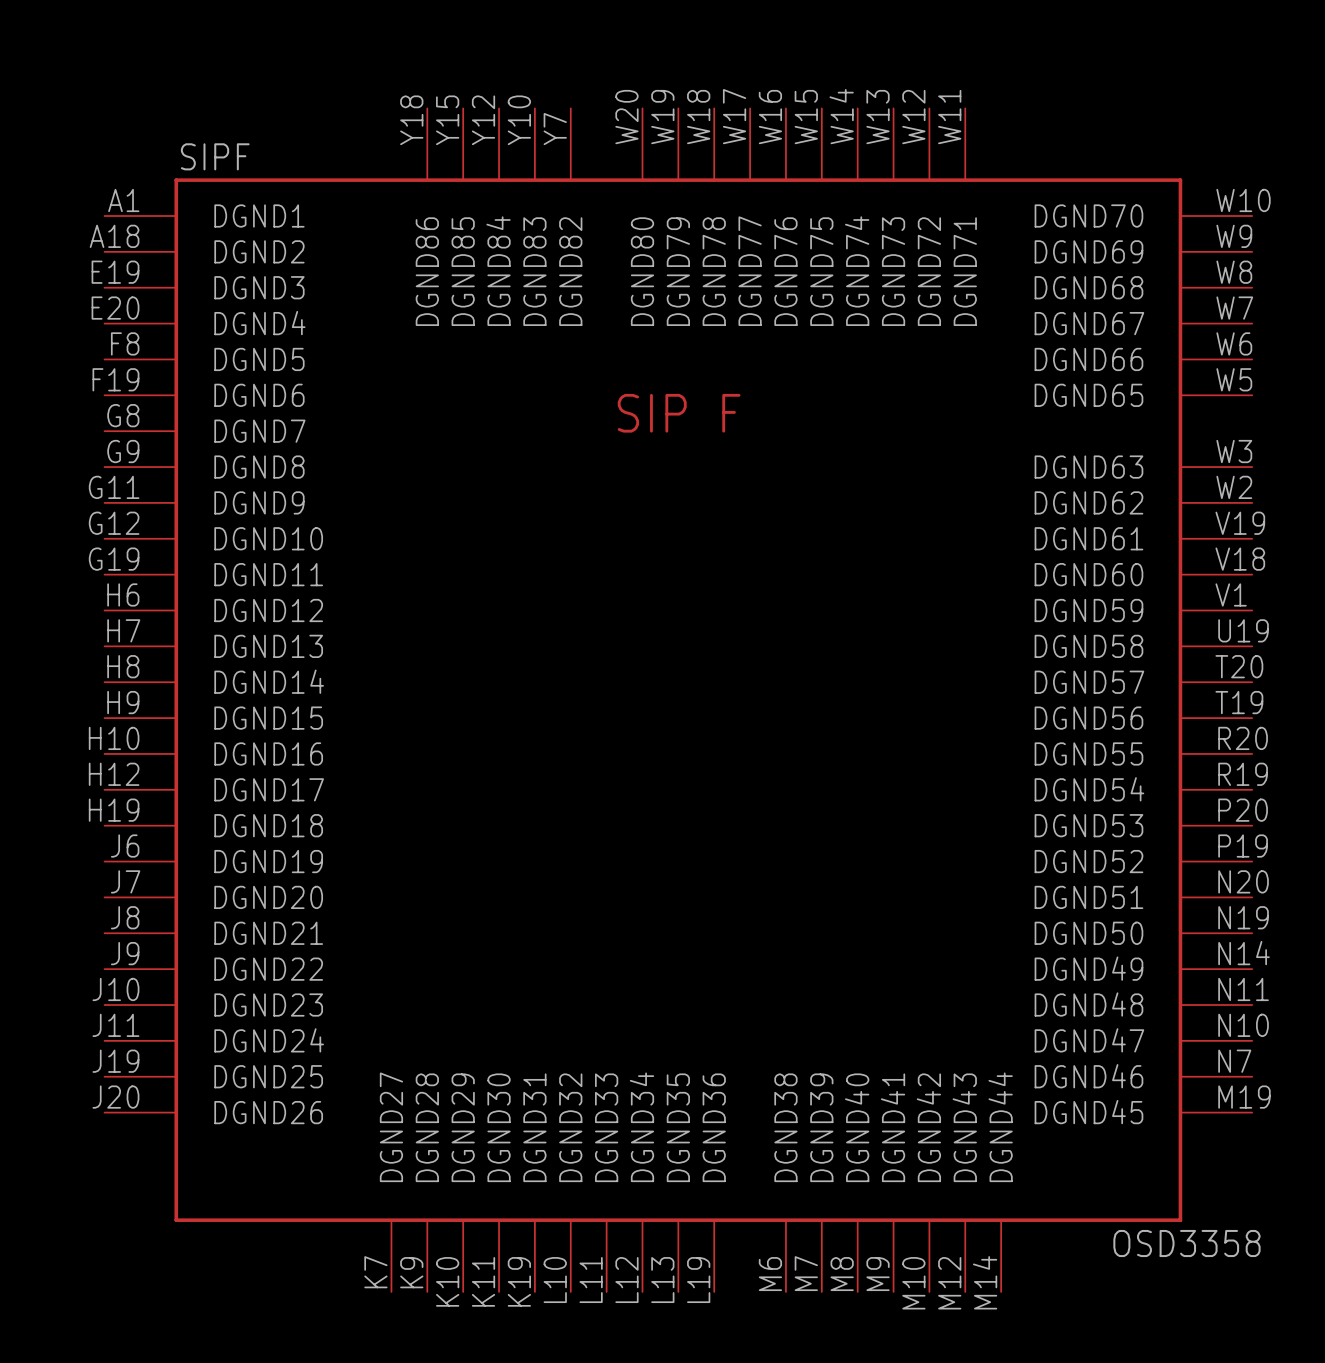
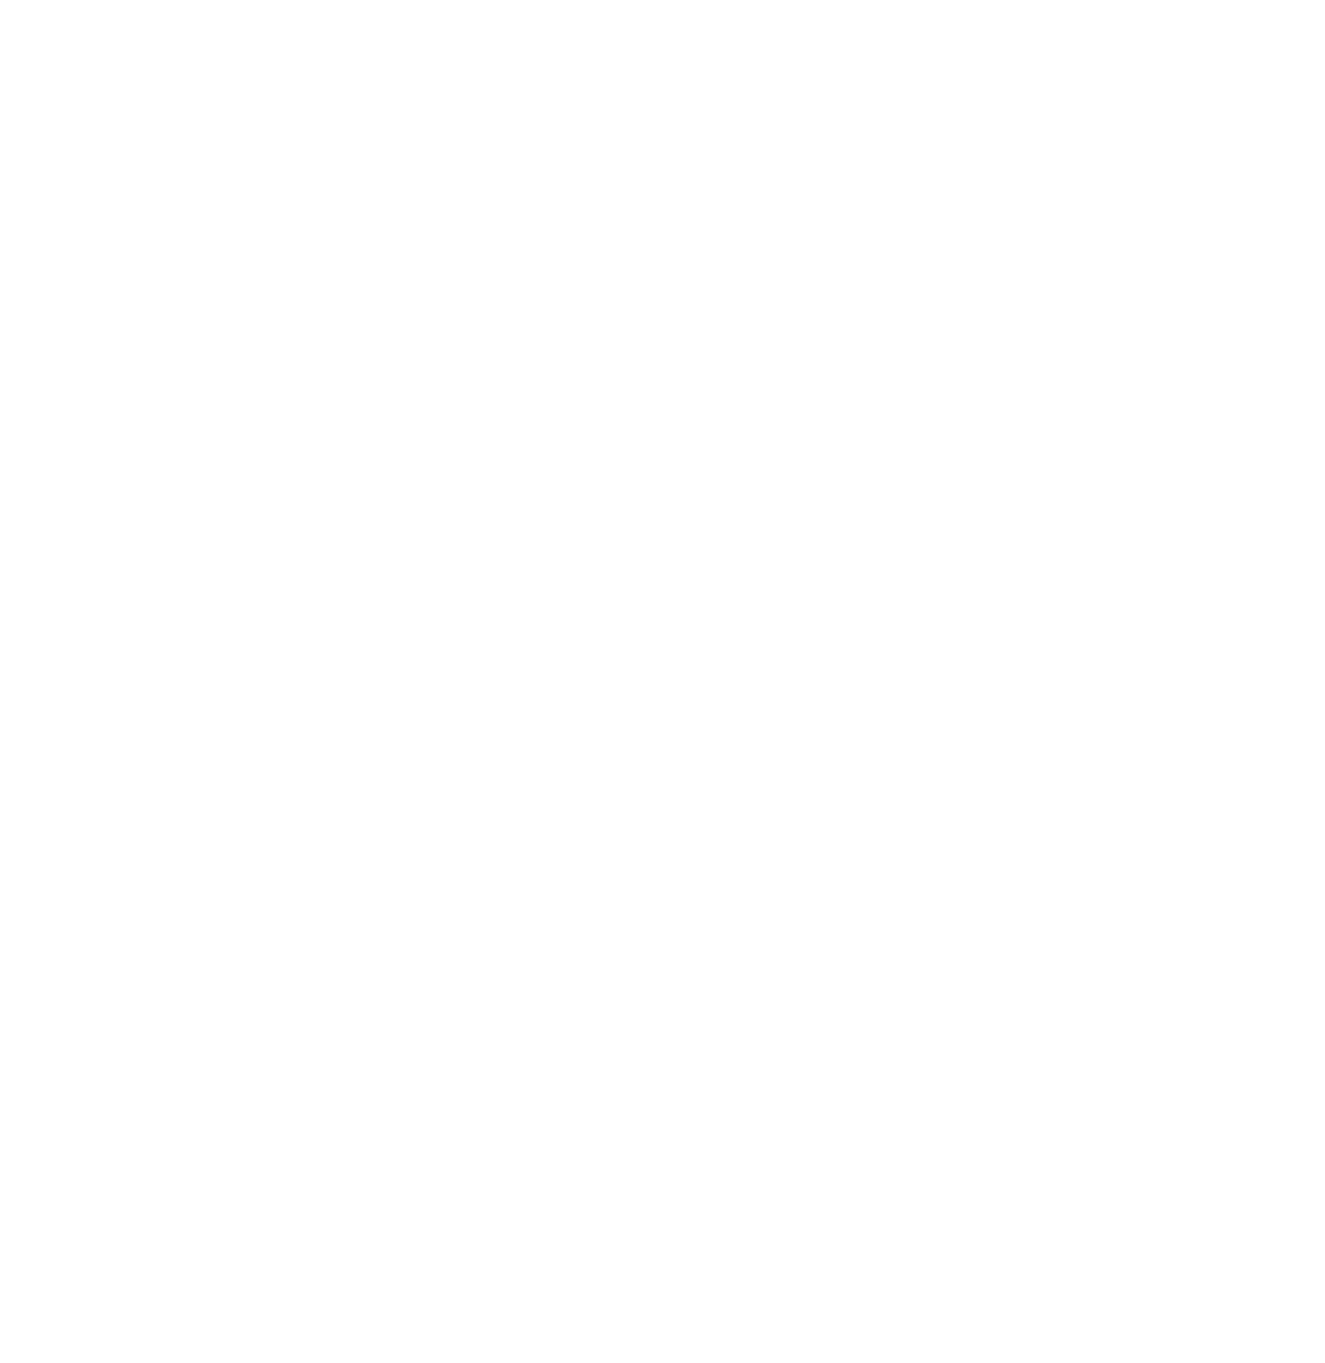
SIPF: OSD3358 (678, 700) -> none

